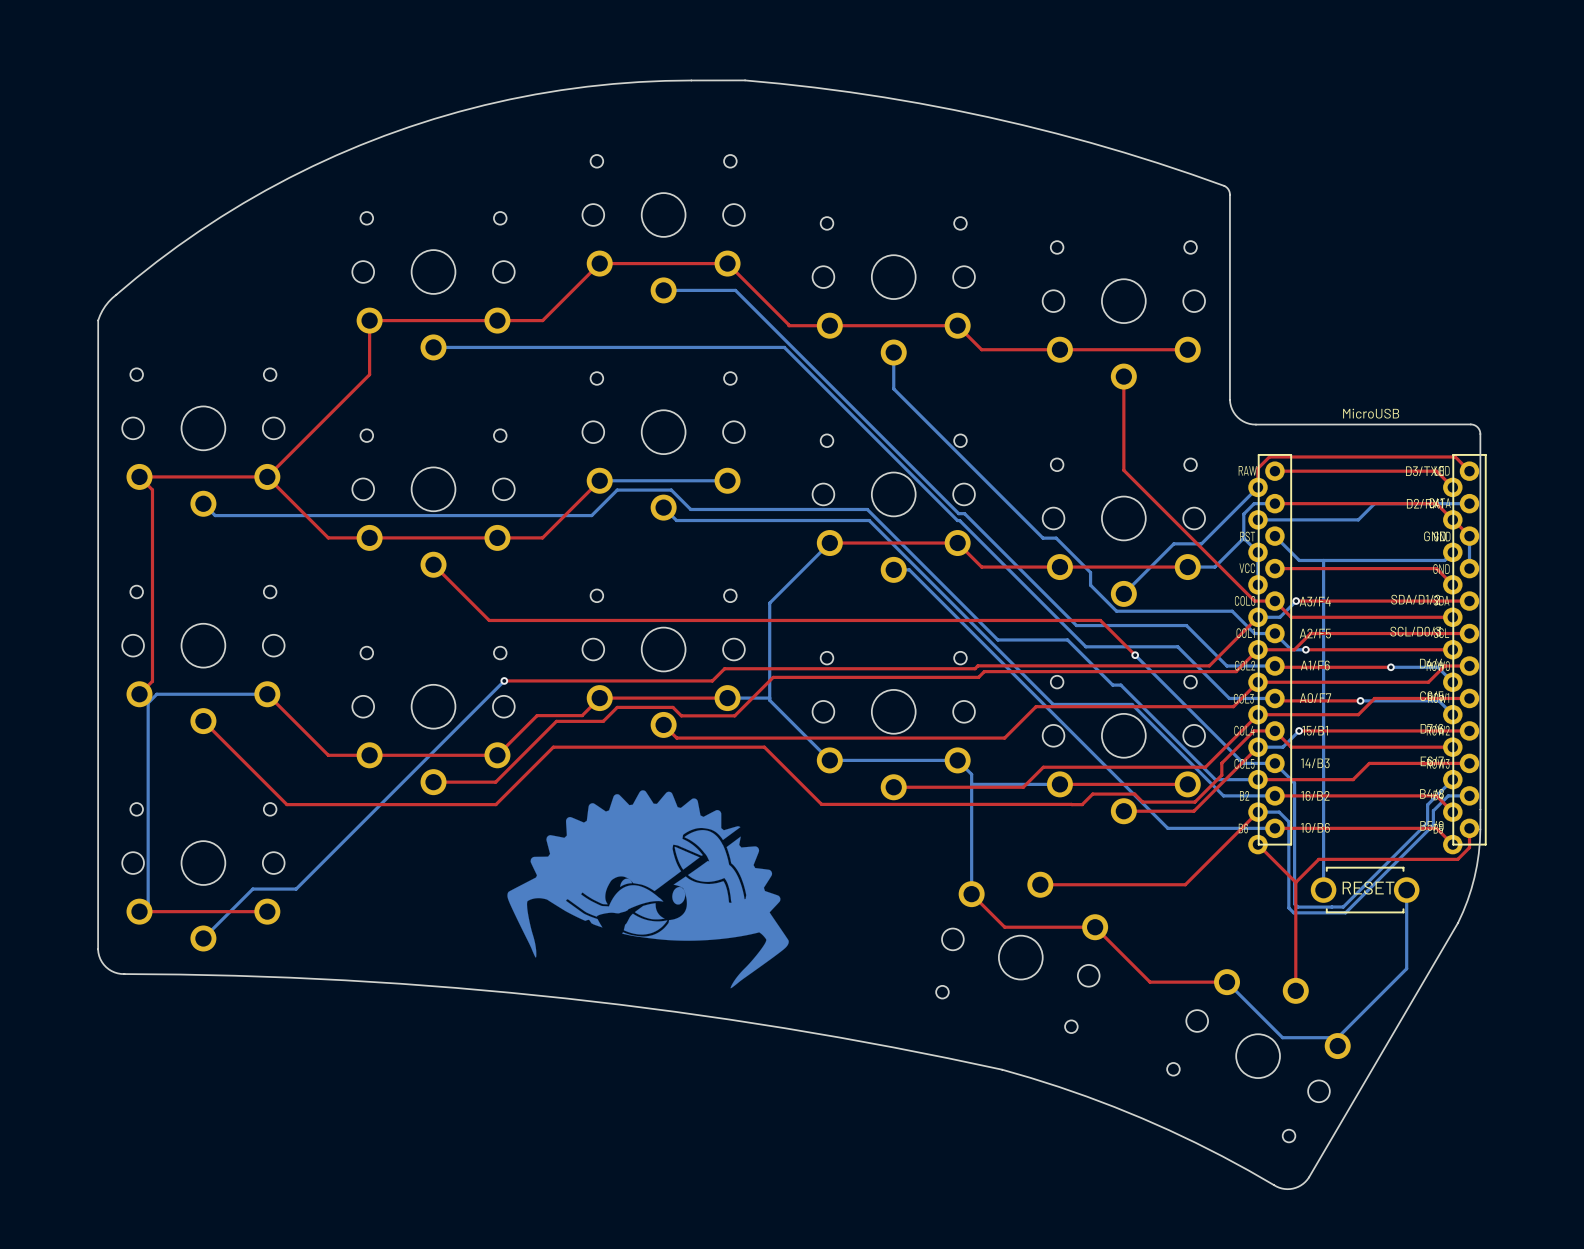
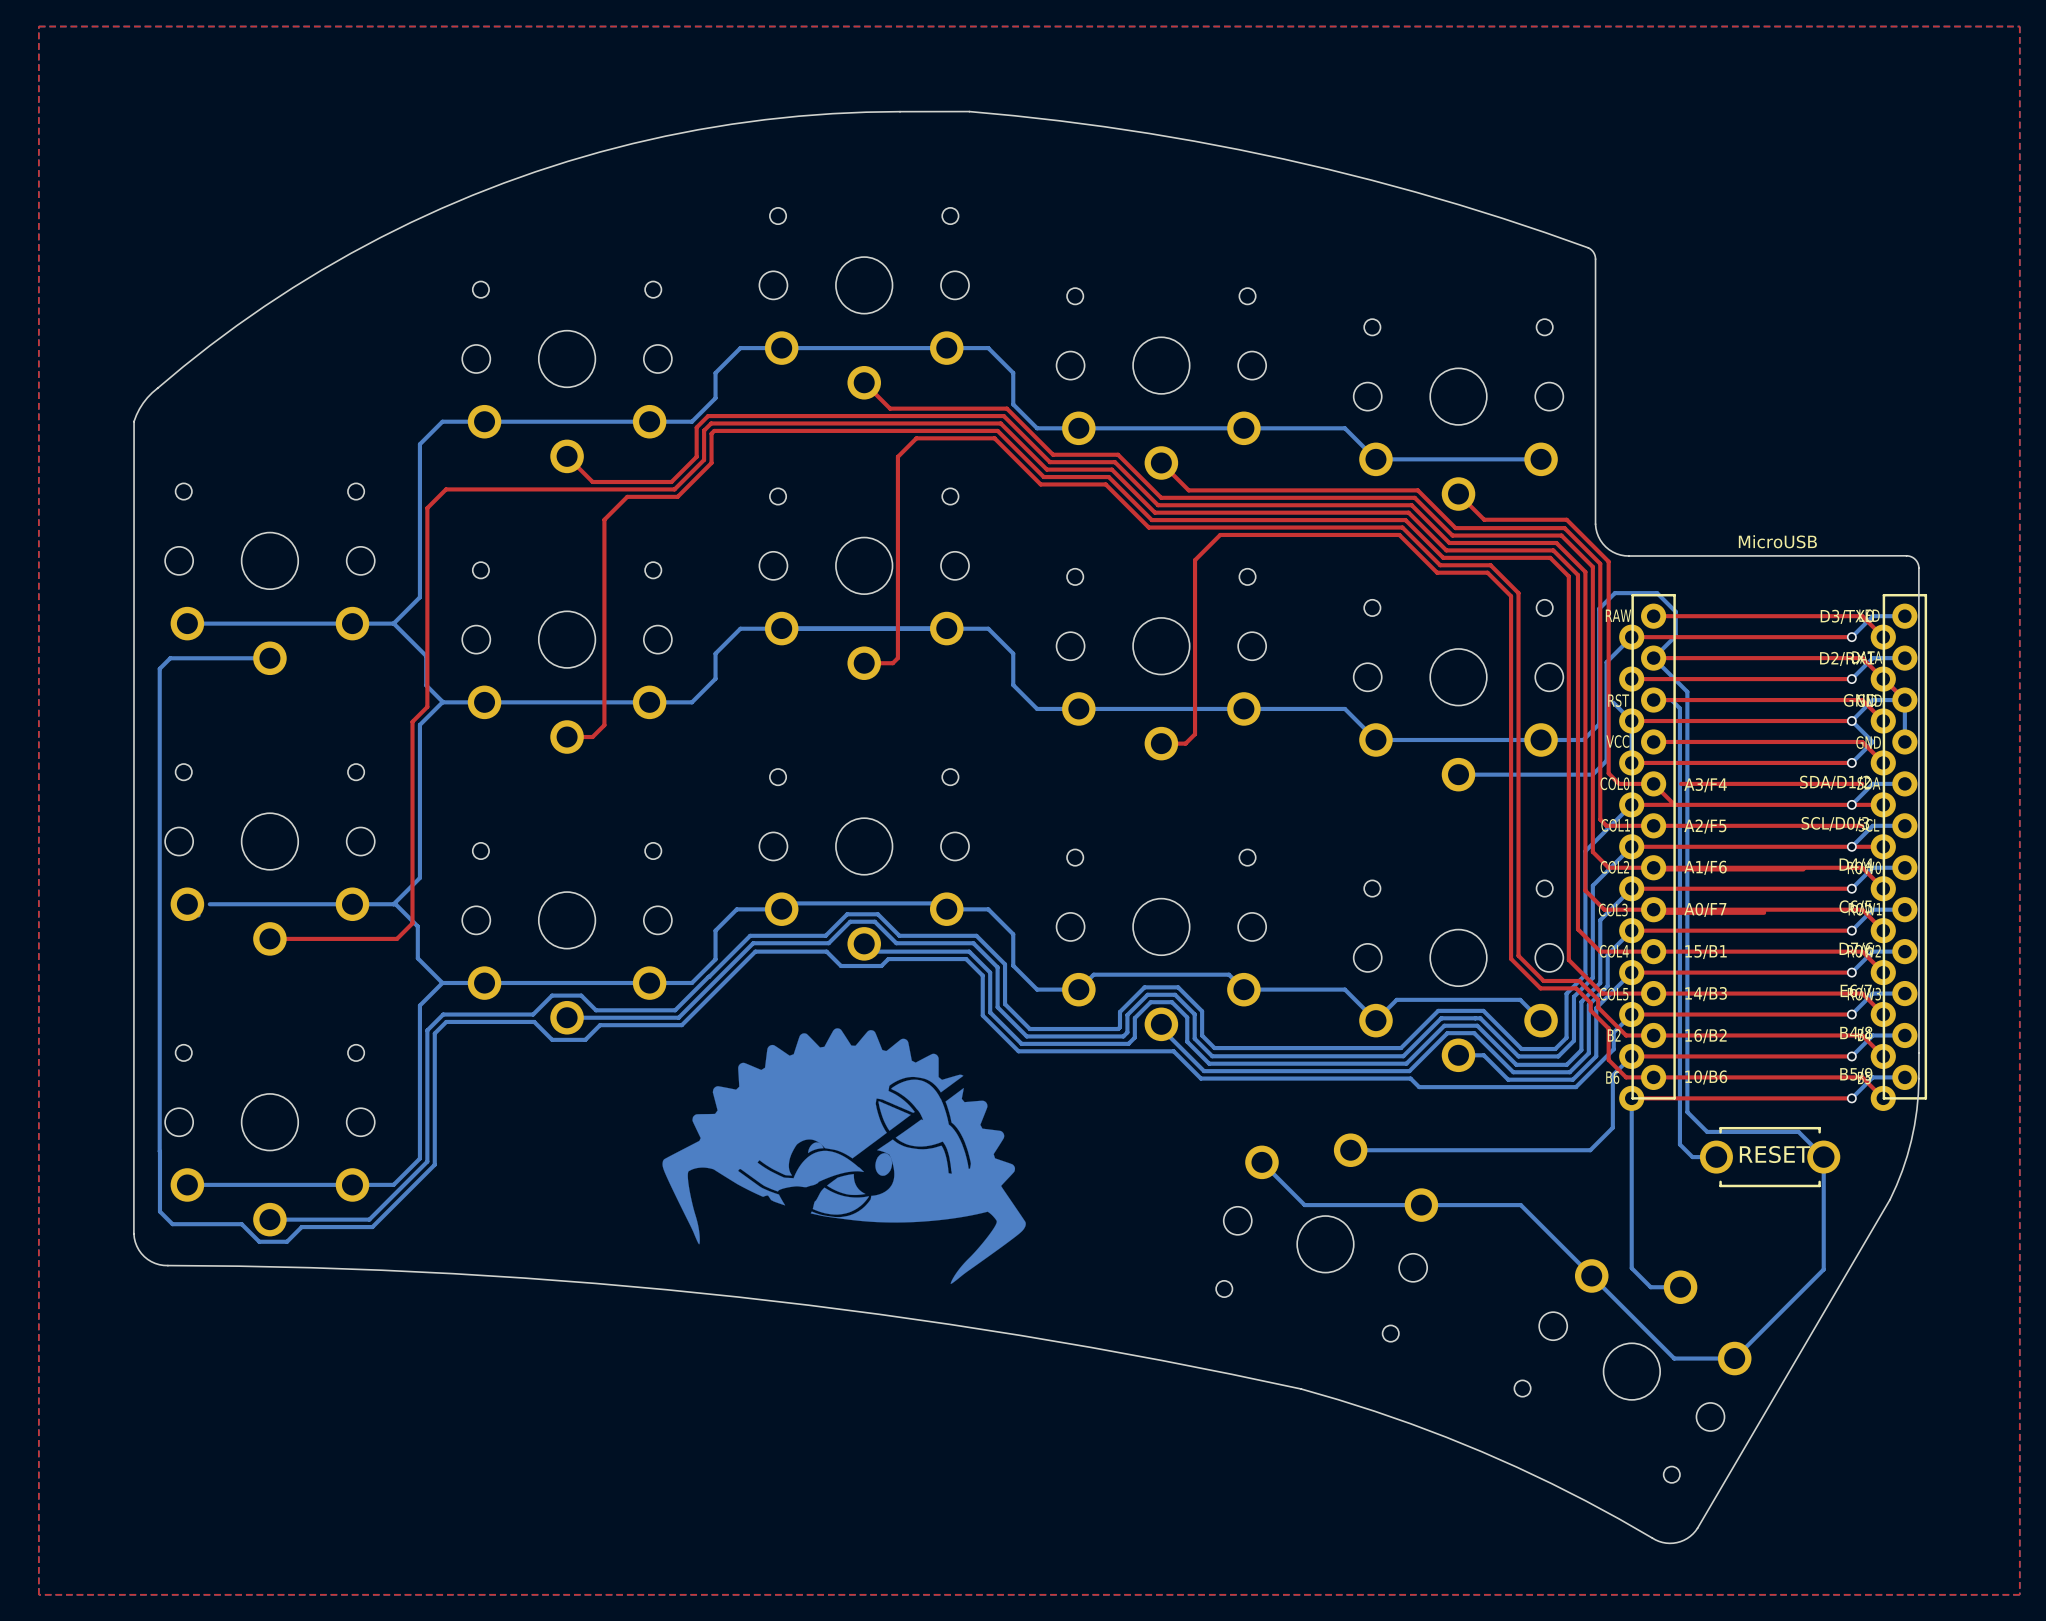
top zone outline: none -> (38, 26) (38, 1594) (2019, 1594) (2019, 26) (38, 26)
top track: none -> (864, 382) (890, 408) (1006, 408) (1053, 454) (1118, 454) (1161, 497) (1414, 497) (1452, 535) (1561, 535) (1592, 566) (1592, 851) (1608, 867) (1862, 867) (1883, 888)
bottom track: (663, 290) (735, 290) (958, 513) (964, 513) (1076, 625) (1186, 625) (1226, 666) (1274, 666) -> none
top track: none -> (567, 456) (592, 482) (671, 482) (696, 456) (696, 427) (708, 416) (1003, 416) (1049, 462) (1114, 462) (1158, 505) (1411, 505) (1449, 542) (1556, 542) (1585, 571) (1585, 890) (1604, 909) (1782, 909)
bottom track: (433, 347) (784, 347) (1085, 646) (1177, 646) (1229, 698) (1274, 698) -> none
top track: (1187, 349) (981, 349) (957, 325) (789, 325) (727, 263) (599, 263) (542, 320) (369, 320) (369, 374) (267, 476) -> none
bottom track: none -> (1541, 459) (1375, 459) (1344, 428) (1037, 428) (1013, 404) (1013, 372) (988, 348) (740, 348) (715, 372) (715, 398) (691, 421) (442, 421) (419, 444) (419, 597) (393, 623)
top track: none -> (1161, 462) (1188, 490) (1417, 490) (1455, 528) (1564, 528) (1600, 563) (1600, 819) (1606, 825) (1699, 825)
bottom track: (893, 352) (893, 388) (1043, 538) (1056, 538) (1090, 572) (1090, 585) (1116, 611) (1232, 611) (1254, 633) (1274, 633) (1291, 649) (1305, 649) -> none
top track: (1123, 376) (1123, 470) (1254, 601) -> (1458, 494) (1484, 519) (1566, 519) (1608, 561) (1608, 773) (1619, 783) (1627, 783)
top track: (1469, 471) (1455, 456) (1269, 456) (1257, 468) (1257, 487) -> (1851, 637) (1631, 637)
bottom track: none -> (1904, 616) (1872, 616) (1851, 637)
bottom track: none -> (187, 623) (393, 623) (426, 656) (426, 685) (442, 702)
top track: (267, 476) (328, 537) (542, 537) (599, 480) -> none
top track: (267, 476) (139, 476) (152, 489) (152, 681) (139, 694) -> none
via: none -> (1851, 637)
bottom track: (203, 503) (215, 515) (591, 515) (617, 490) (671, 490) (690, 509) (867, 509) (997, 639) (1067, 639) (1112, 685) (1120, 685) (1215, 779) (1257, 779) -> (159, 1151) (159, 1211) (172, 1224) (241, 1224) (259, 1241) (287, 1241) (301, 1227) (372, 1227) (434, 1164) (434, 1033) (446, 1021) (534, 1021) (552, 1039) (585, 1039) (600, 1025) (681, 1025) (755, 951) (826, 951) (841, 966) (881, 966) (888, 959) (966, 959) (982, 975) (982, 1015) (1018, 1051) (1173, 1051) (1200, 1078) (1410, 1078) (1419, 1087) (1575, 1087) (1613, 1049) (1613, 1032) (1631, 1014)
bottom track: none -> (269, 658) (170, 658) (159, 668) (159, 1151)
bottom track: (1274, 503) (1254, 503) (1243, 514) (1243, 538) (1214, 567) -> (1823, 1157) (1798, 1131) (1707, 1131) (1687, 1112) (1687, 691) (1653, 658) (1675, 635) (1675, 611) (1657, 593) (1614, 593) (1599, 608) (1599, 724) (1583, 739) (1576, 739)
bottom track: (1444, 503) (1374, 503) (1358, 519) (1257, 519) -> (1872, 658) (1851, 679)
bottom track: (1238, 506) (1201, 543) (1173, 543) (1123, 593) -> (1606, 662) (1606, 760) (1592, 774) (1458, 774)
top track: none -> (864, 663) (892, 663) (897, 658) (897, 456) (916, 438) (994, 438) (1040, 484) (1105, 484) (1148, 527) (1402, 527) (1440, 565) (1490, 565) (1518, 593) (1518, 955) (1543, 980) (1579, 980) (1598, 999) (1598, 1007) (1626, 1035) (1653, 1035)
bottom track: (663, 507) (676, 520) (869, 520) (1053, 704) (1132, 704) (1223, 795) (1274, 795) -> none
top track: none -> (1631, 679) (1851, 679)
via: none -> (1851, 679)
bottom track: none -> (1883, 679) (1904, 700) (1872, 700) (1851, 721) (1872, 741) (1851, 762)
top track: none -> (1653, 700) (1862, 700) (1883, 721)
bottom track: (1274, 536) (1299, 560) (1444, 560) (1452, 552) -> none
bottom track: none -> (442, 702) (691, 702) (715, 678) (715, 653) (740, 628) (988, 628) (1013, 653) (1013, 685) (1037, 708) (1344, 708) (1375, 739) (1541, 739)
bottom track: none -> (442, 702) (419, 724) (419, 877) (393, 904)
top track: (829, 543) (957, 543) (981, 567) (1187, 567) -> none
bottom track: (829, 543) (769, 603) (769, 700) (829, 760) (957, 760) (971, 774) (971, 894) -> (1591, 1275) (1520, 1205) (1304, 1205) (1261, 1162)
top track: none -> (1631, 721) (1851, 721)
via: none -> (1851, 721)
bottom track: (1323, 560) (1323, 890) -> (1653, 700) (1671, 700) (1679, 708) (1679, 1144) (1692, 1157) (1716, 1157)
top track: (433, 564) (489, 620) (1100, 620) (1135, 655) -> (567, 737) (592, 737) (604, 725) (604, 519) (627, 496) (677, 496) (711, 463) (711, 433) (714, 430) (997, 430) (1043, 477) (1108, 477) (1151, 520) (1405, 520) (1443, 557) (1550, 557) (1568, 576) (1568, 960) (1602, 993) (1775, 993)
top track: none -> (1161, 743) (1185, 743) (1195, 734) (1195, 560) (1220, 534) (1399, 534) (1437, 572) (1487, 572) (1511, 596) (1511, 958) (1540, 988) (1576, 988) (1590, 1002) (1590, 1010) (1608, 1028) (1608, 1059) (1626, 1077) (1653, 1077)
bottom track: (893, 569) (909, 569) (1167, 828) (1274, 828) -> none
top track: none -> (1631, 762) (1851, 762)
via: none -> (1851, 762)
bottom track: (1296, 601) (1279, 617) (1257, 617) -> none
via: (1296, 601) -> none
top track: (1436, 601) (1469, 601) -> none
bottom track: none -> (1904, 783) (1872, 783) (1851, 804)
top track: (1257, 617) (1209, 665) (724, 668) (712, 680) (504, 680) -> (1631, 804) (1674, 804)
via: none -> (1851, 804)
top track: (1310, 633) (1294, 649) -> (1693, 846) (1678, 846)
top track: (1436, 633) (1469, 633) -> none
bottom track: none -> (1904, 825) (1872, 825) (1851, 846)
top track: (1257, 649) (1236, 671) (984, 671) (978, 677) (773, 677) (734, 715) (681, 715) (672, 707) (617, 707) (603, 721) (556, 721) (495, 782) (433, 782) -> none
bottom track: none -> (1631, 846) (1592, 885) (1592, 977) (1573, 996) (1573, 1040) (1558, 1056) (1518, 1056) (1480, 1018) (1441, 1018) (1403, 1056) (1212, 1056) (1194, 1038) (1194, 1014) (1175, 994) (1147, 994) (1127, 1015) (1127, 1032) (1123, 1036) (1026, 1036) (997, 1007) (997, 967) (973, 943) (896, 943) (874, 921) (850, 921) (828, 943) (753, 943) (678, 1017) (567, 1017)
via: (1305, 649) -> none
via: none -> (1851, 846)
bottom track: (1135, 655) (1243, 763) (1274, 763) (1294, 783) (1294, 903) (1297, 907) (1331, 907) -> none
via: (1135, 655) -> none
top track: (1469, 666) (1444, 666) (1428, 682) -> none
bottom track: none -> (1904, 867) (1872, 867) (1851, 888)
bottom track: (1390, 667) (1437, 667) (1452, 682) -> none
via: (1390, 667) -> none
bottom track: (504, 680) (296, 889) (252, 889) (203, 938) -> (1631, 804) (1585, 851) (1585, 974) (1566, 993) (1566, 1037) (1555, 1049) (1521, 1049) (1483, 1010) (1438, 1010) (1401, 1048) (1214, 1048) (1202, 1035) (1202, 1011) (1178, 987) (1144, 987) (1119, 1011) (1119, 1027) (1118, 1029) (1029, 1029) (1005, 1004) (1005, 964) (976, 935) (899, 935) (877, 914) (847, 914) (825, 935) (750, 935) (675, 1010) (596, 1010) (581, 995) (552, 995) (533, 1014) (443, 1014) (427, 1030) (427, 1161) (369, 1219) (269, 1219)
via: (504, 680) -> none
top track: (1257, 682) (1233, 706) (1036, 706) (1004, 738) (676, 738) (663, 724) -> none
bottom track: none -> (1631, 888) (1600, 920) (1600, 983) (1581, 1001) (1581, 1050) (1566, 1064) (1516, 1064) (1477, 1025) (1444, 1025) (1406, 1063) (1209, 1063) (1187, 1041) (1187, 1017) (1172, 1002) (1150, 1002) (1134, 1018) (1134, 1037) (1128, 1043) (1021, 1043) (990, 1012) (990, 972) (969, 951) (871, 951) (864, 943)
via: none -> (1851, 888)
bottom track: (156, 694) (148, 702) (148, 902) (139, 911) -> (442, 982) (419, 1005) (419, 1158) (393, 1184) (187, 1184)
top track: (267, 694) (328, 755) (497, 755) (537, 715) (582, 715) (599, 698) (727, 698) -> none
bottom track: none -> (352, 904) (395, 904) (417, 926) (417, 958) (442, 982)
bottom track: (727, 698) (769, 698) -> none
top track: (1374, 698) (1358, 714) -> (1851, 930) (1761, 930)
top track: (1436, 698) (1469, 698) -> (1862, 909) (1883, 930)
bottom track: none -> (1904, 909) (1872, 909) (1851, 930)
bottom track: (1360, 700) (1438, 700) (1452, 714) -> none
via: (1360, 700) -> none
top track: (1257, 714) (1205, 767) (1043, 767) (1023, 787) (893, 787) -> none
bottom track: none -> (1631, 930) (1607, 954) (1607, 986) (1588, 1004) (1588, 1053) (1569, 1072) (1513, 1072) (1474, 1033) (1447, 1033) (1409, 1071) (1204, 1071) (1161, 1028) (1161, 1024)
via: none -> (1851, 930)
top track: (203, 721) (286, 804) (495, 804) (553, 747) (764, 747) (821, 804) (1082, 804) (1092, 794) (1134, 794) (1142, 802) (1194, 802) (1221, 775) (1221, 763) (1254, 730) -> (269, 938) (397, 938) (412, 923) (412, 721) (427, 706) (427, 508) (446, 489) (674, 489) (704, 459) (704, 430) (711, 423) (1000, 423) (1046, 469) (1111, 469) (1154, 512) (1408, 512) (1446, 550) (1553, 550) (1577, 575) (1577, 929) (1600, 951) (1626, 951)
top track: (1274, 730) (1291, 747) -> (1653, 951) (1684, 951)
bottom track: (1299, 730) (1282, 747) (1257, 747) -> (1458, 1055) (1483, 1055) (1508, 1079) (1572, 1079) (1596, 1056) (1596, 1008) (1631, 972)
via: (1299, 730) -> none
top track: (1436, 730) (1469, 730) -> none
bottom track: none -> (1904, 951) (1872, 951) (1851, 972)
top track: (1257, 747) (1193, 811) (1123, 811) -> (1631, 972) (1674, 972)
top track: (1428, 747) (1452, 747) -> (1862, 951) (1883, 972)
via: none -> (1851, 972)
bottom track: none -> (442, 982) (691, 982) (715, 959) (715, 930) (736, 909) (781, 909) (787, 903) (940, 903) (946, 909) (988, 909) (1013, 934) (1013, 965) (1037, 989) (1078, 989) (1093, 974) (1229, 974) (1243, 989) (1344, 989) (1375, 1020) (1396, 999) (1520, 999) (1541, 1020)
top track: (1369, 763) (1353, 779) -> (1851, 1014) (1754, 1014)
top track: (1436, 763) (1469, 763) -> (1862, 993) (1883, 1014)
bottom track: none -> (1904, 993) (1872, 993) (1851, 1014)
via: none -> (1851, 1014)
bottom track: (1452, 779) (1427, 804) (1427, 822) (1343, 906) (1331, 906) -> none
bottom track: (971, 784) (1059, 784) -> none
top track: (1059, 784) (1187, 784) -> none
bottom track: (1448, 795) (1433, 810) (1433, 825) (1345, 912) (1293, 912) (1288, 907) (1288, 821) (1279, 812) (1257, 812) -> (1877, 1035) (1872, 1035) (1851, 1056)
top track: (1257, 812) (1185, 884) (1040, 884) -> (1631, 1056) (1851, 1056)
bottom track: none -> (1631, 1056) (1612, 1075) (1612, 1127) (1590, 1150) (1350, 1150)
via: none -> (1851, 1056)
top track: (1469, 828) (1469, 847) (1457, 859) (1318, 859) (1295, 882) -> none
bottom track: none -> (1904, 1077) (1872, 1077) (1851, 1098)
top track: (1257, 844) (1295, 882) -> (1631, 1098) (1851, 1098)
bottom track: none -> (1631, 1098) (1631, 1268) (1650, 1287) (1680, 1287)
via: none -> (1851, 1098)
top track: (1295, 882) (1295, 990) -> none
top track: (971, 894) (1004, 927) (1095, 927) (1150, 982) (1227, 982) -> none
top track: (139, 911) (267, 911) -> none
bottom track: (1406, 968) (1337, 1037) -> (1823, 1258) (1823, 1269) (1734, 1358) (1674, 1358) (1663, 1347)
bottom track: (1282, 1037) (1337, 1037) -> none

